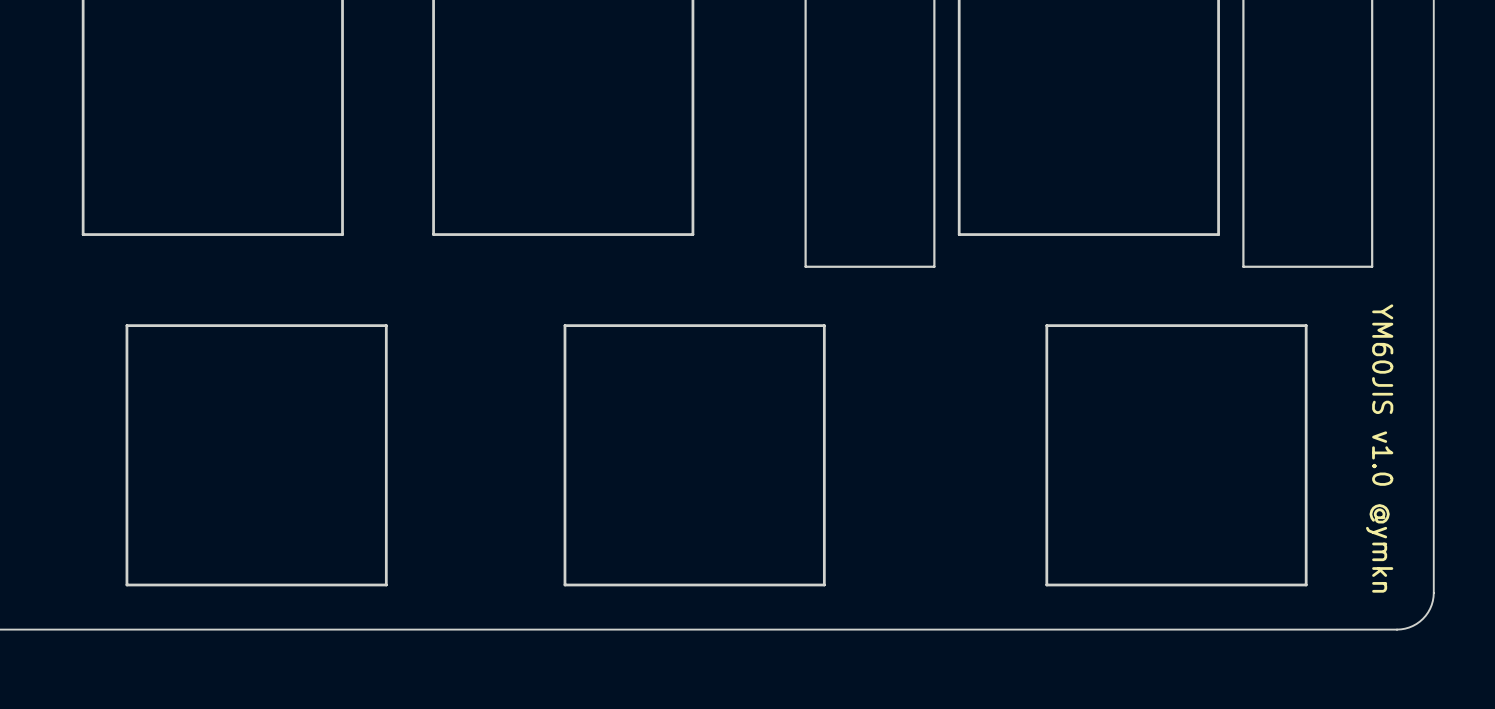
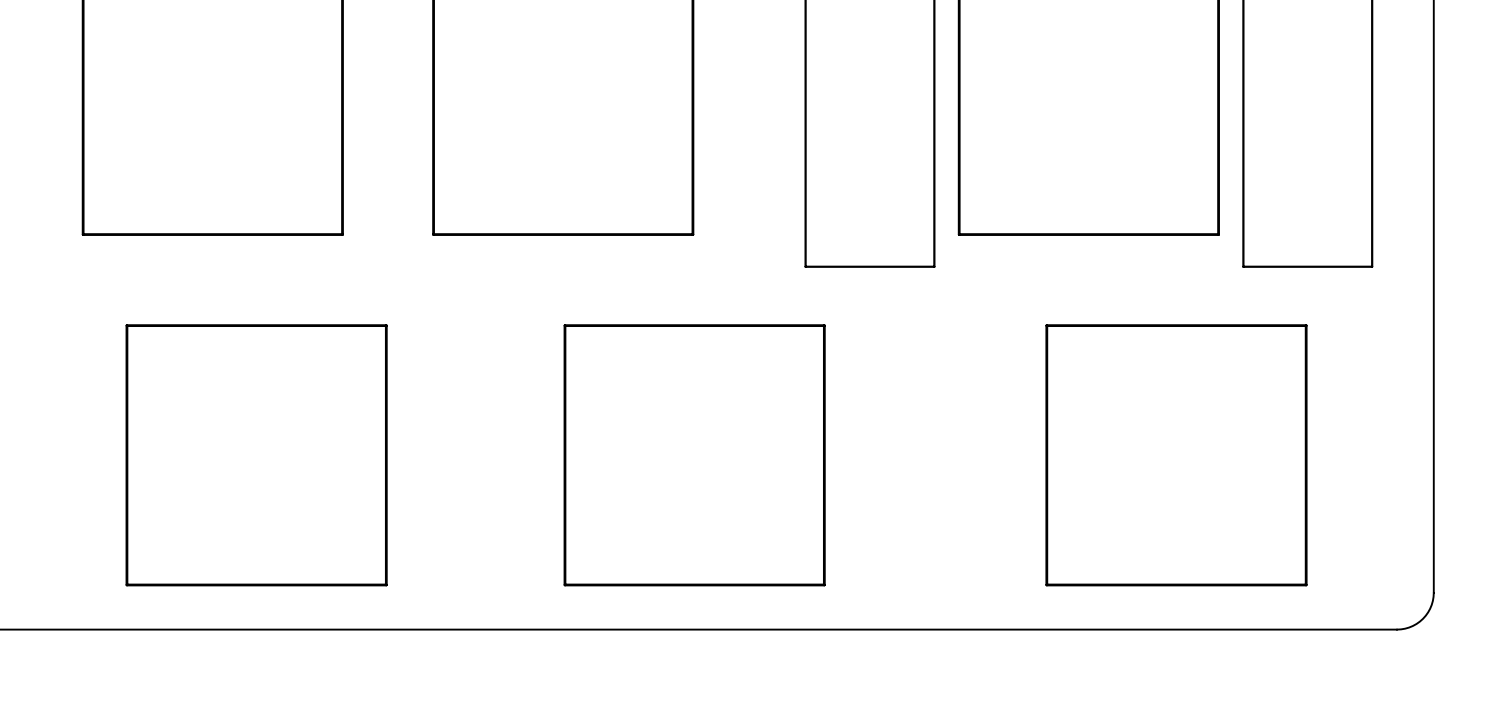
text: YM60JIS v1.0 @ymkn (1379, 448) -> none

